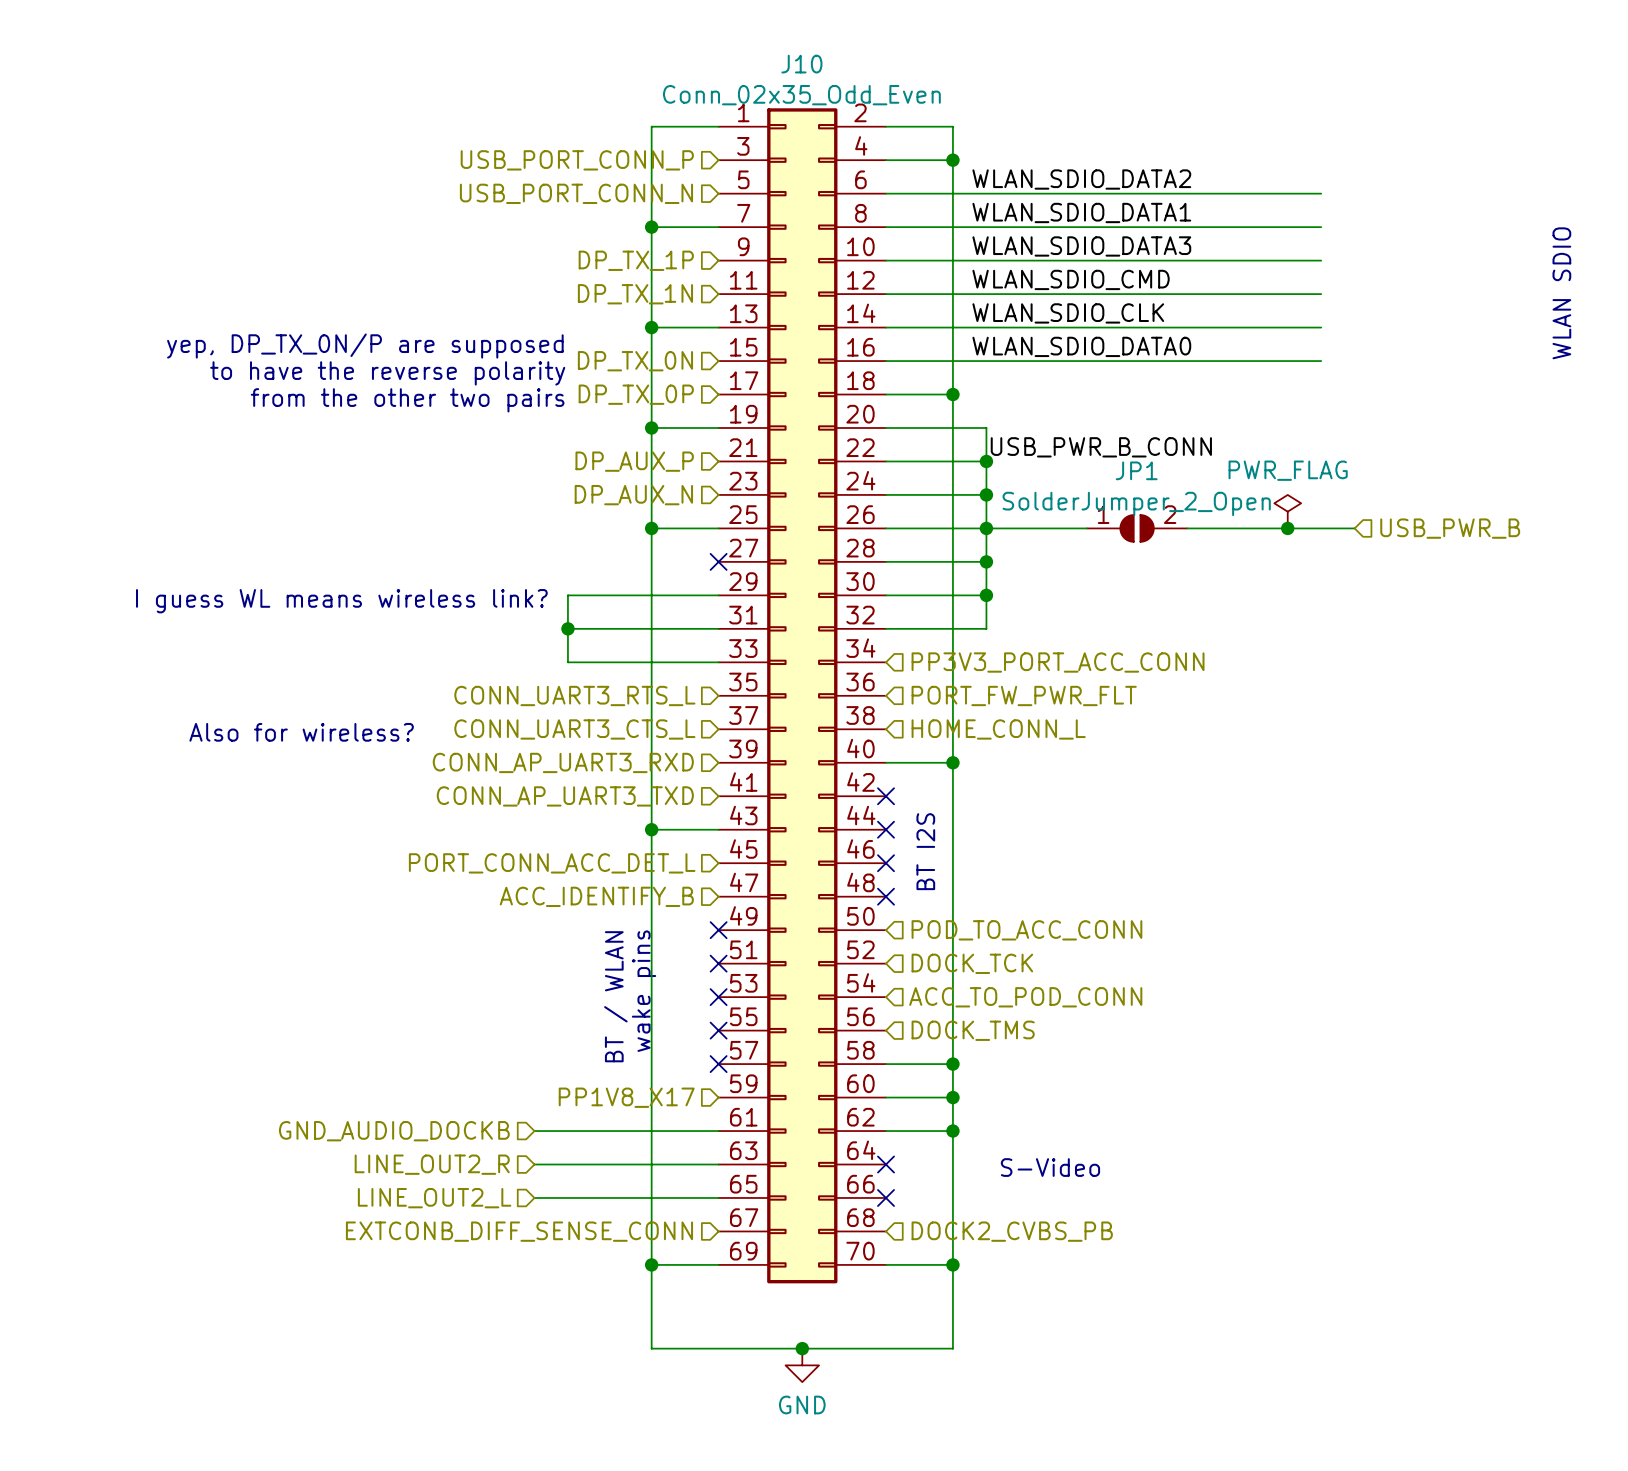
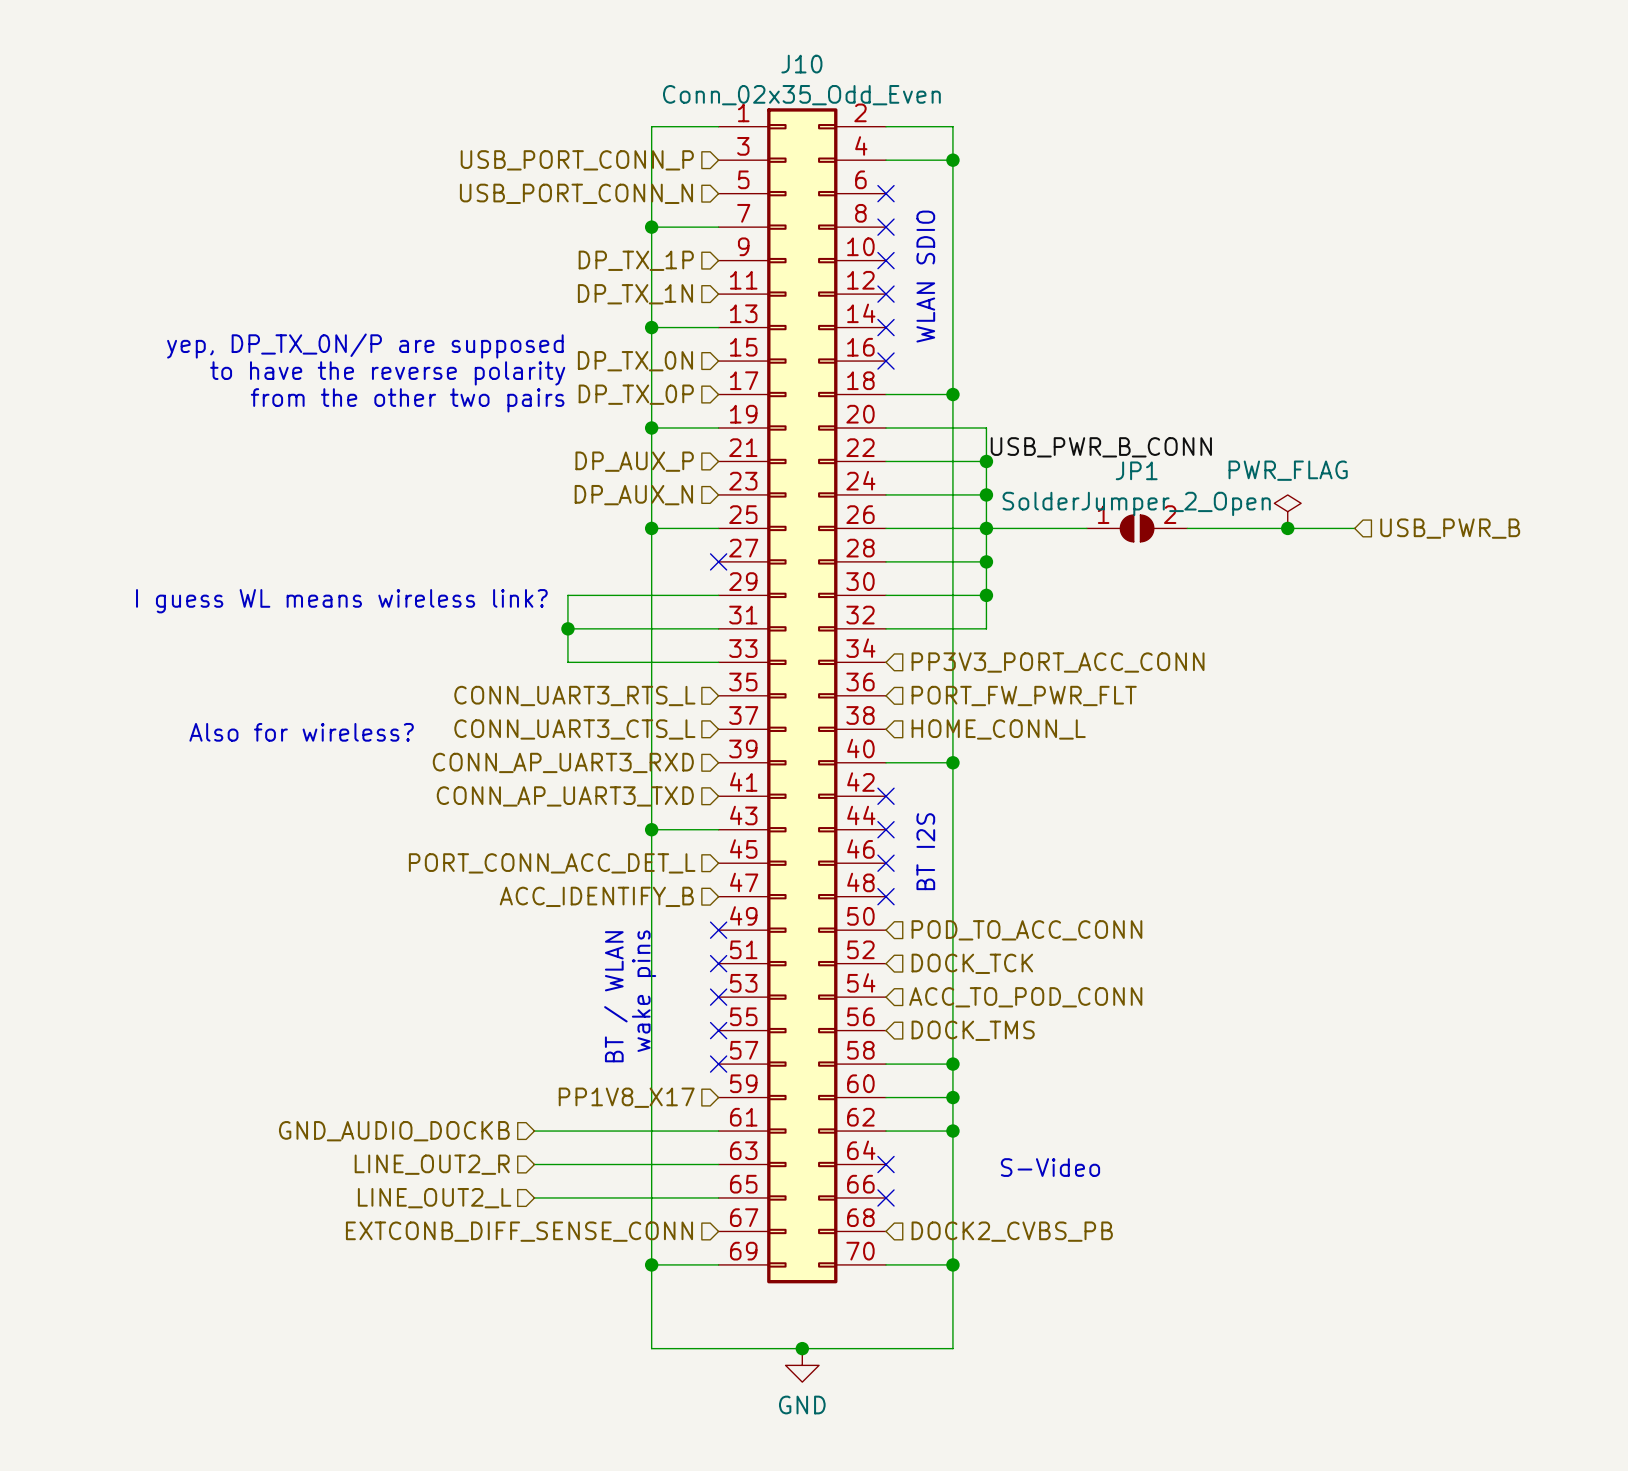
label: WLAN_SDIO_DATA2 (1081, 179) -> none
wire: (886, 193) (1321, 193) -> none
no-connect mark: none -> (886, 193)
label: WLAN_SDIO_DATA1 (1081, 212) -> none
wire: (886, 227) (1321, 227) -> none
no-connect mark: none -> (886, 227)
label: WLAN_SDIO_DATA3 (1081, 246) -> none
wire: (886, 260) (1321, 260) -> none
no-connect mark: none -> (886, 260)
text: none -> WLAN SDIO (925, 276)
label: WLAN_SDIO_CMD (1071, 279) -> none
text: WLAN SDIO (1561, 293) -> none
wire: (886, 294) (1321, 294) -> none
no-connect mark: none -> (886, 294)
label: WLAN_SDIO_CLK (1068, 313) -> none
wire: (886, 327) (1321, 327) -> none
no-connect mark: none -> (886, 327)
label: WLAN_SDIO_DATA0 (1081, 346) -> none
wire: (886, 361) (1321, 361) -> none
no-connect mark: none -> (886, 361)

